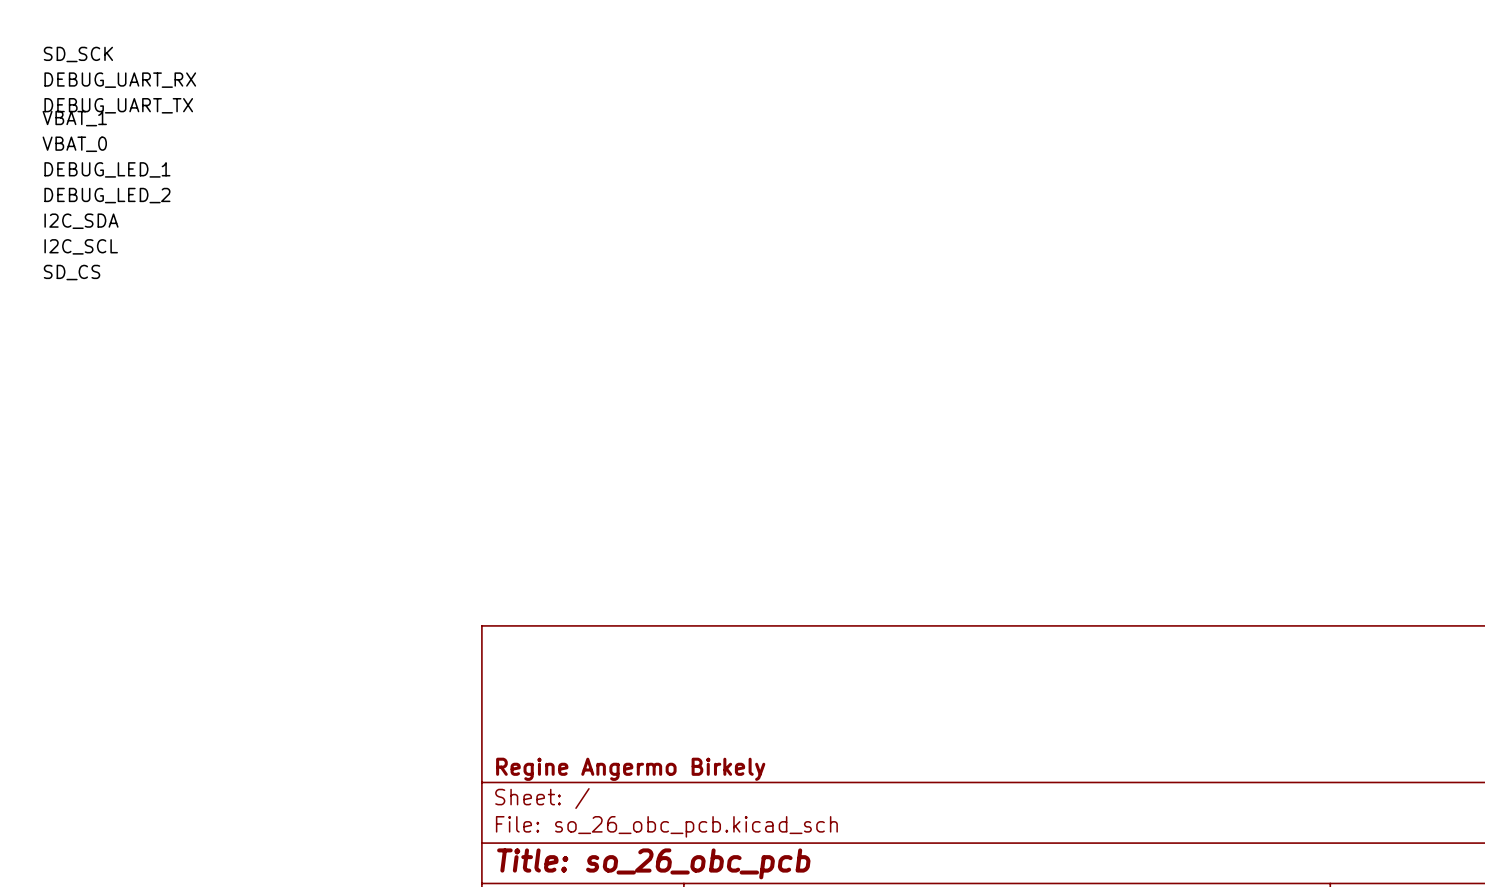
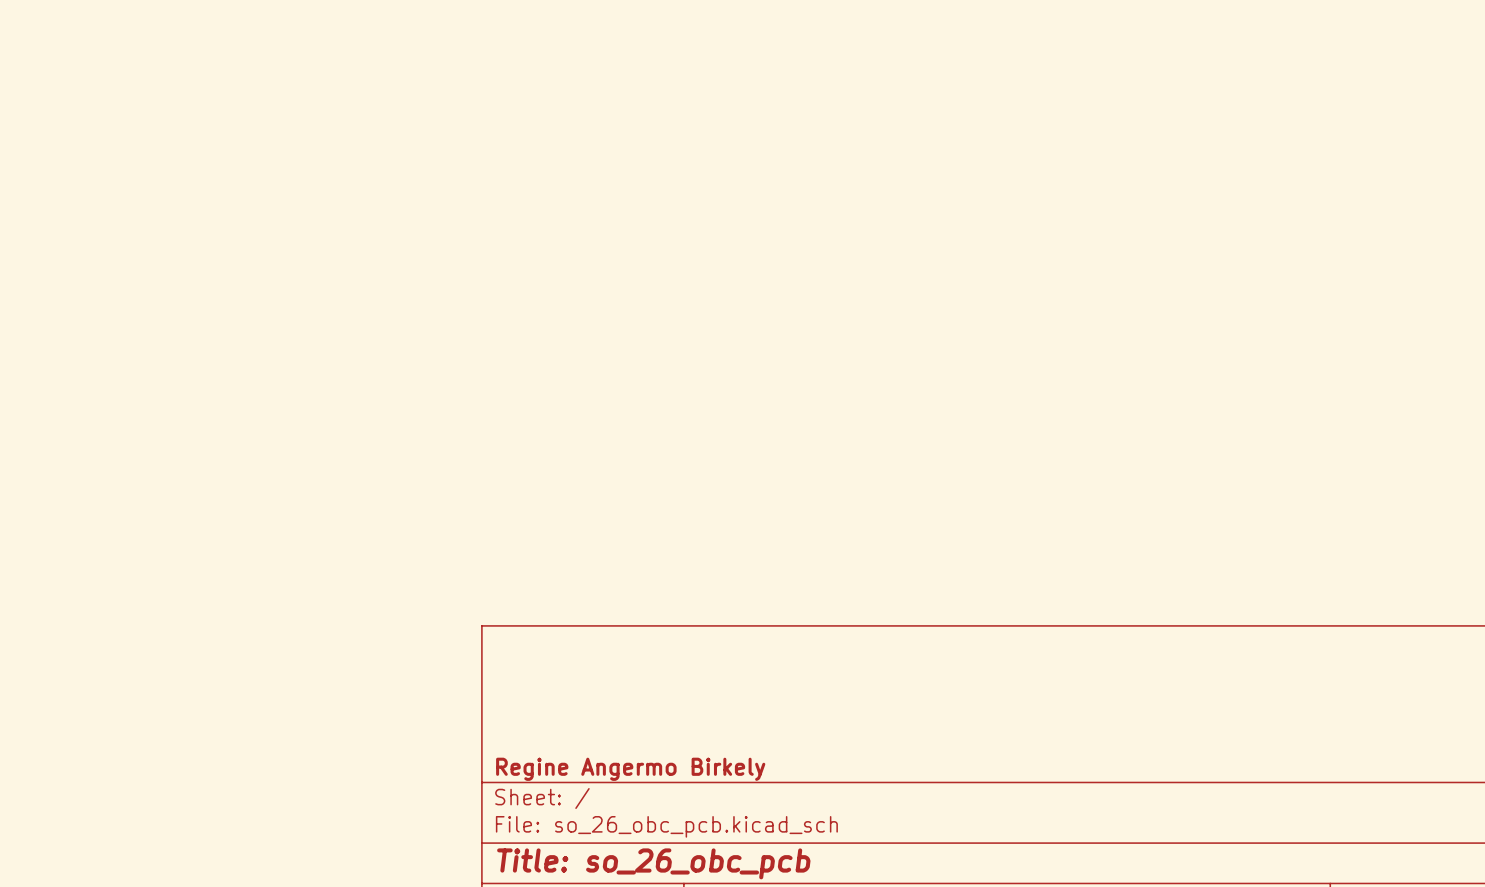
label: SD_SCK (78, 54) -> none
label: DEBUG_UART_RX (120, 80) -> none
label: DEBUG_UART_TX (118, 105) -> none
label: VBAT_1 (74, 118) -> none
label: VBAT_0 (74, 144) -> none
label: DEBUG_LED_1 (107, 169) -> none
label: DEBUG_LED_2 (107, 195) -> none
label: I2C_SDA (81, 221) -> none
label: I2C_SCL (81, 246) -> none
label: SD_CS (72, 272) -> none

